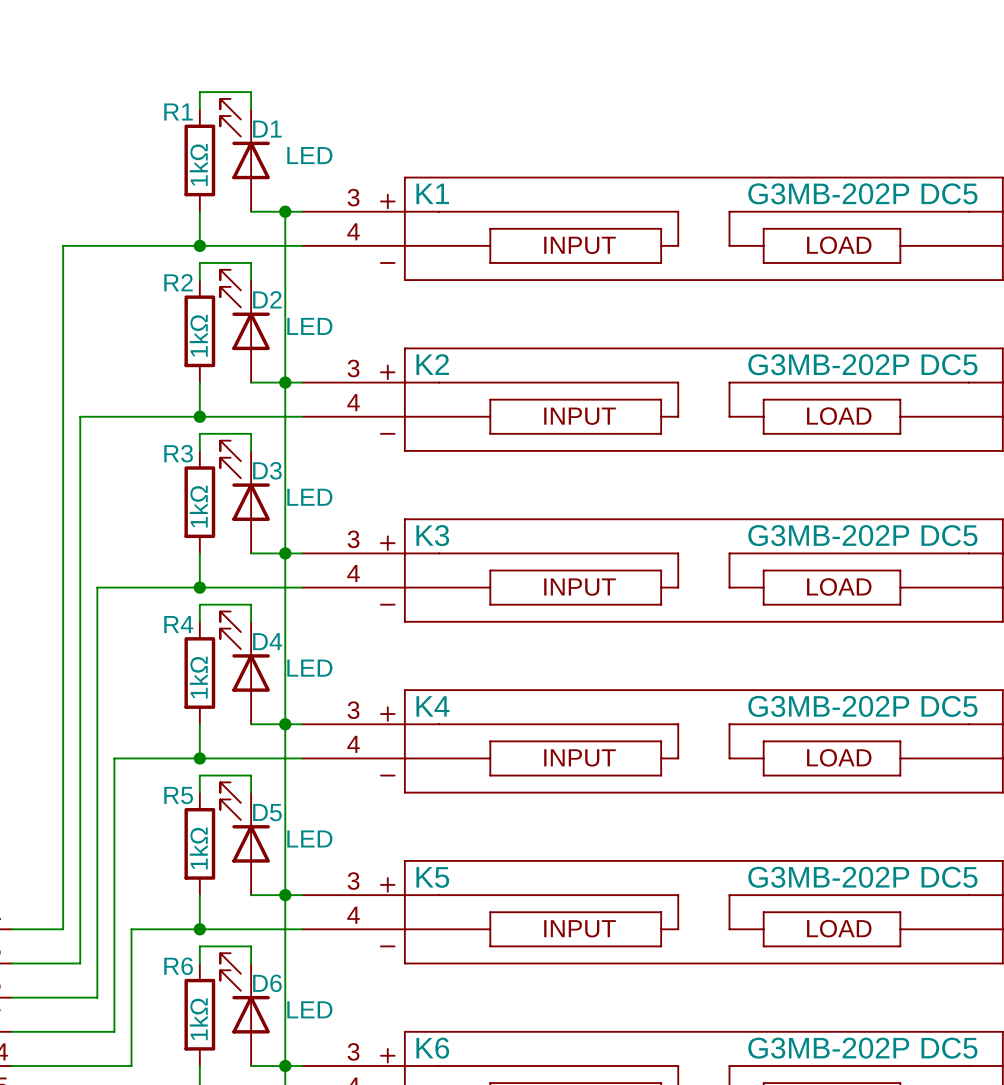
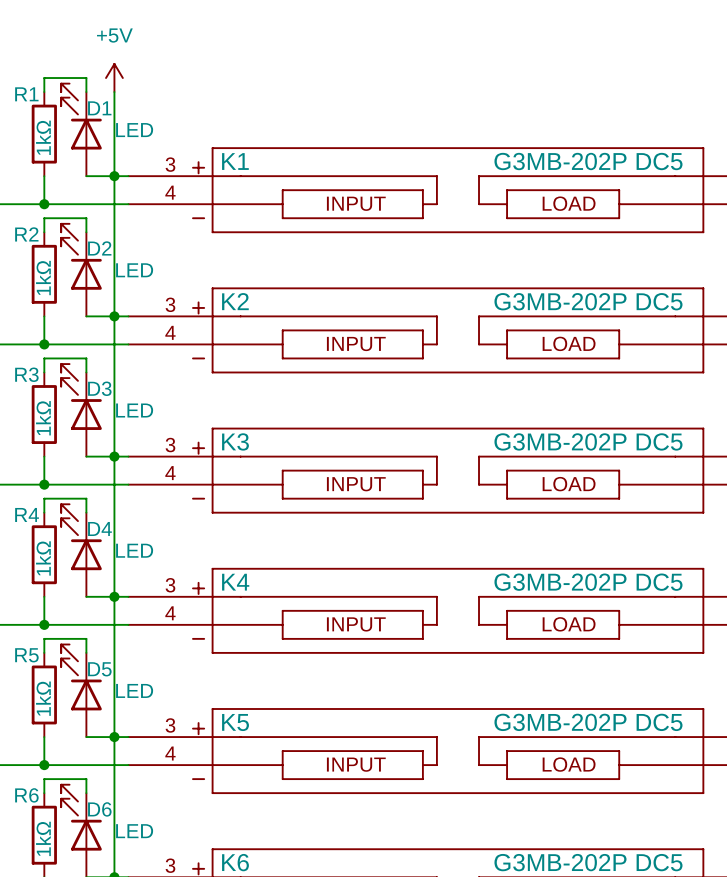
power symbol: none -> +5V (114, 78)
wire: none -> (114, 92) (114, 176)

